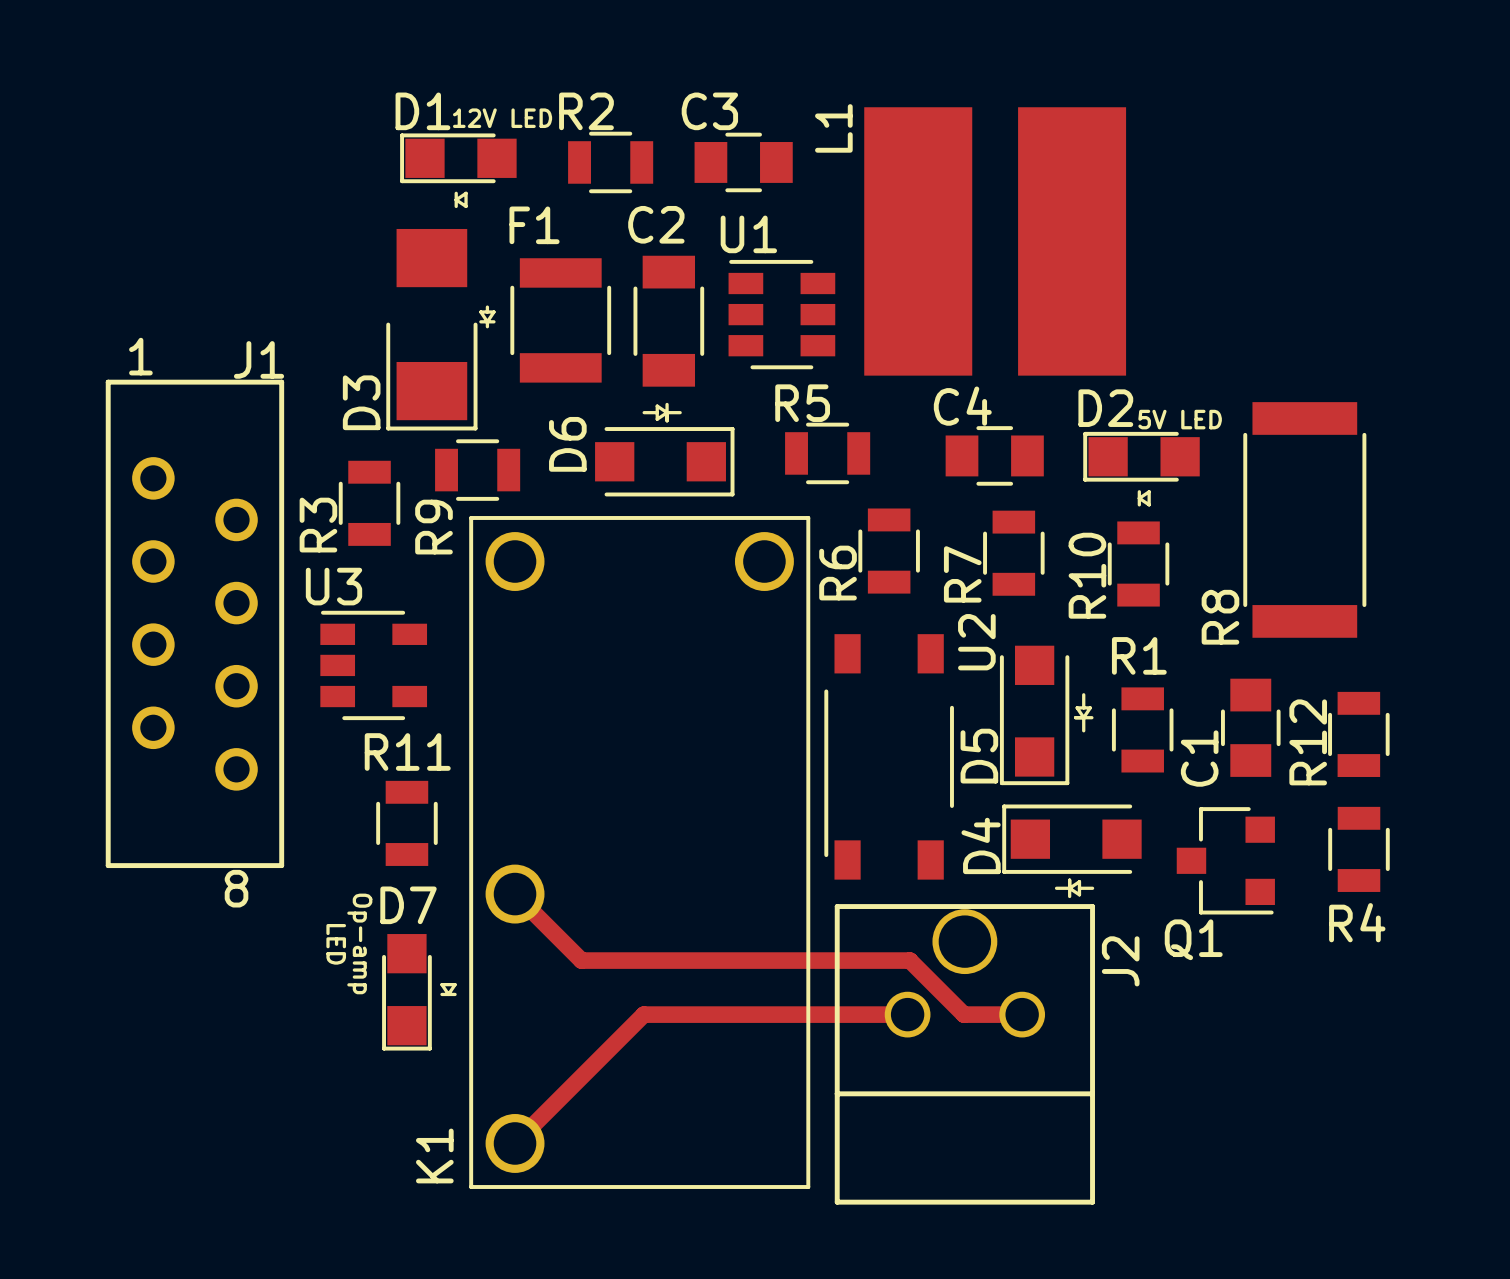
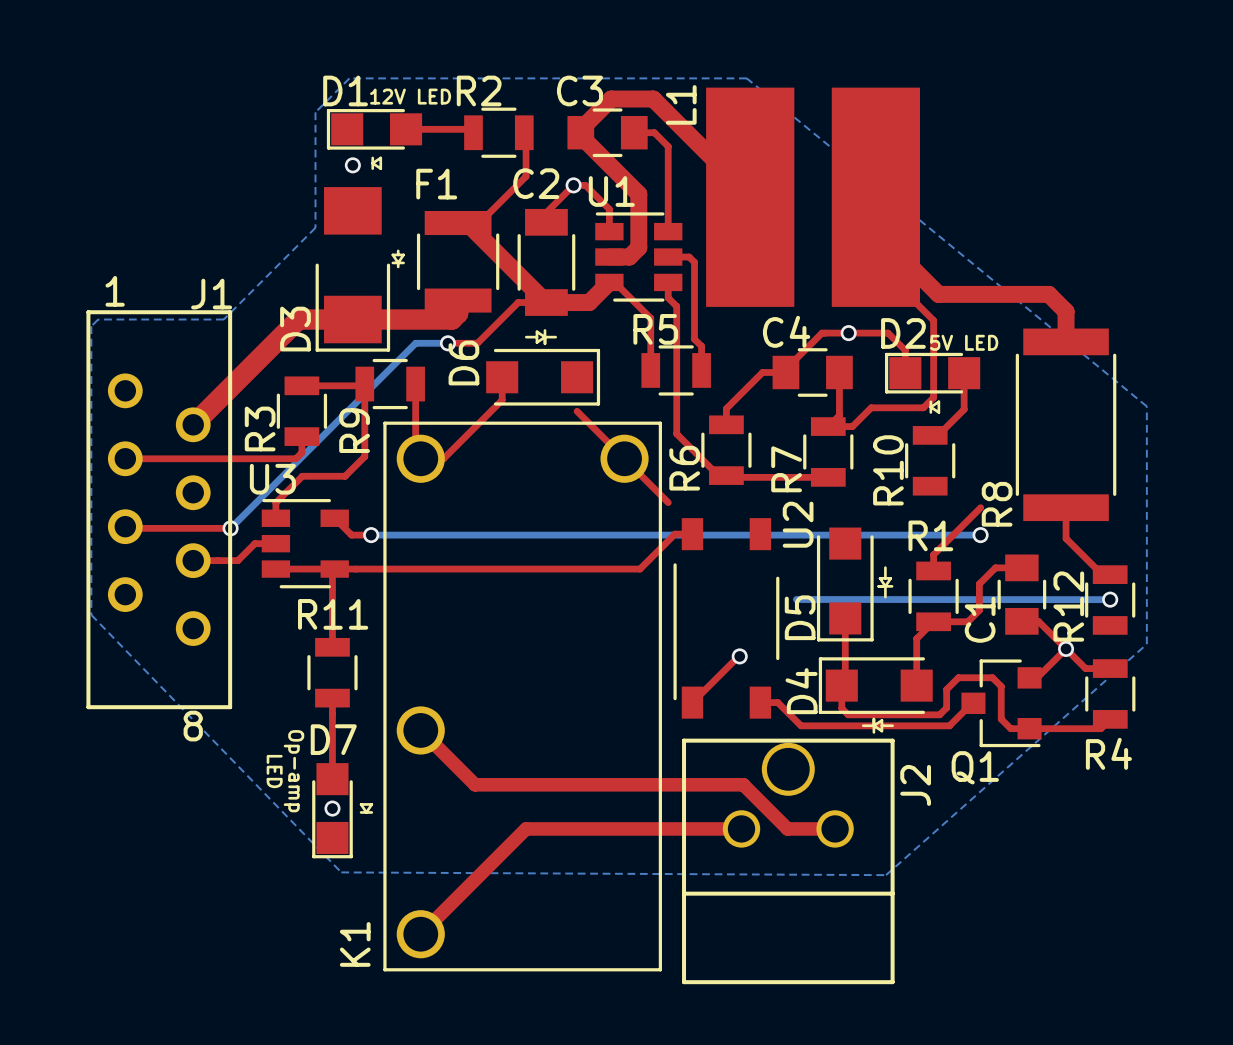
bottom zone outline: none -> (349, 78) (746, 78) (1146, 406) (1146, 644) (886, 875) (341, 872) (91, 614) (91, 326) (98, 319) (223, 319) (315, 227) (315, 112) (349, 78)
top track: none -> (475, 128) (406, 129)
top track: none -> (526, 128) (526, 176) (479, 223) (458, 223) (466, 223) (546, 302)
top track: none -> (634, 132) (654, 132) (668, 146) (668, 231)
via: none -> (352, 165)
via: none -> (573, 185)
top track: none -> (750, 197) (653, 99) (611, 99) (580, 129) (580, 136) (638, 194) (638, 247) (629, 257) (609, 257)
top track: none -> (546, 222) (546, 212) (573, 185) (585, 185) (609, 209) (609, 231)
top track: none -> (668, 257) (689, 257) (694, 262) (694, 339) (701, 346) (701, 370)
top track: none -> (668, 282) (668, 297) (676, 306) (676, 433) (718, 475) (728, 477) (828, 477)
top track: none -> (458, 300) (458, 313) (452, 319) (298, 319) (193, 424)
top track: none -> (546, 302) (518, 302) (477, 343) (447, 343)
top track: none -> (546, 302) (589, 302) (609, 282) (614, 282) (650, 318) (650, 370)
via: none -> (848, 333)
top track: none -> (1066, 341) (1066, 311) (1048, 294) (938, 294) (875, 231) (875, 197) (875, 262) (933, 320) (933, 397) (923, 407) (871, 407) (852, 426) (828, 426) (839, 415) (839, 372)
bottom track: none -> (447, 343) (415, 343) (230, 528)
via: none -> (447, 343)
top track: none -> (905, 373) (905, 350) (888, 333) (822, 333) (785, 369) (785, 372) (762, 372) (726, 408) (726, 424)
top track: none -> (964, 373) (964, 409) (938, 435) (930, 435)
top track: none -> (502, 377) (502, 400) (443, 458) (420, 458) (415, 453) (415, 384)
top track: none -> (301, 385) (363, 385) (364, 384) (364, 456) (345, 476) (302, 476) (275, 502) (275, 518)
top track: none -> (577, 411) (668, 502)
top track: none -> (301, 436) (301, 452) (295, 458) (125, 458)
top track: none -> (980, 507) (933, 554) (933, 570)
top track: none -> (1066, 507) (1066, 538) (1102, 574) (1110, 574)
top track: none -> (334, 518) (351, 535) (371, 535)
top track: none -> (125, 526) (127, 528) (230, 528)
via: none -> (230, 528)
top track: none -> (692, 534) (674, 534) (640, 569) (275, 569)
bottom track: none -> (371, 535) (980, 535)
via: none -> (371, 535)
via: none -> (980, 535)
top track: none -> (275, 543) (254, 543) (237, 560) (193, 560)
top track: none -> (1018, 567) (995, 567) (979, 584) (979, 610) (967, 621) (933, 621) (916, 638) (916, 685)
top track: none -> (334, 569) (332, 571) (332, 647)
bottom track: none -> (796, 599) (1110, 599)
via: none -> (1110, 599)
top track: none -> (845, 618) (845, 682) (841, 685) (841, 708) (848, 714) (939, 714) (946, 707) (946, 689) (958, 677) (992, 677) (1001, 686) (1001, 719) (1010, 728) (1100, 728) (1110, 719)
top track: none -> (1021, 621) (1038, 621) (1085, 668) (1110, 668)
top track: none -> (1066, 648) (1037, 677) (1029, 677)
via: none -> (1066, 648)
top track: none -> (739, 656) (692, 702)
via: none -> (739, 656)
top track: none -> (332, 698) (332, 779)
top track: none -> (760, 702) (777, 702) (801, 725) (949, 725) (973, 703)
via: none -> (332, 808)

